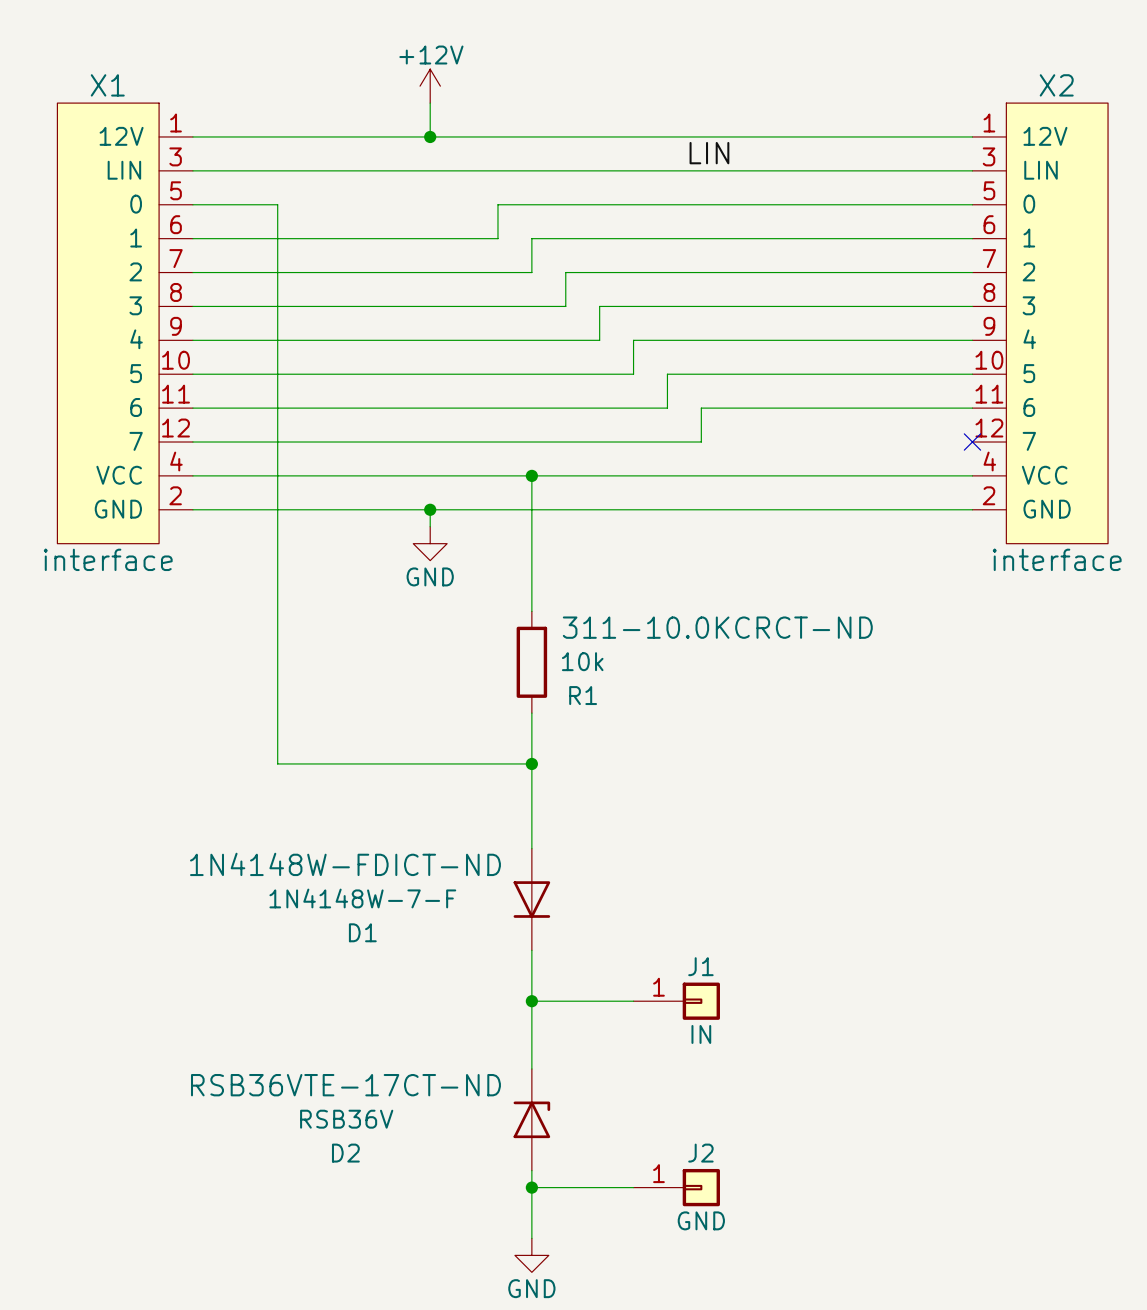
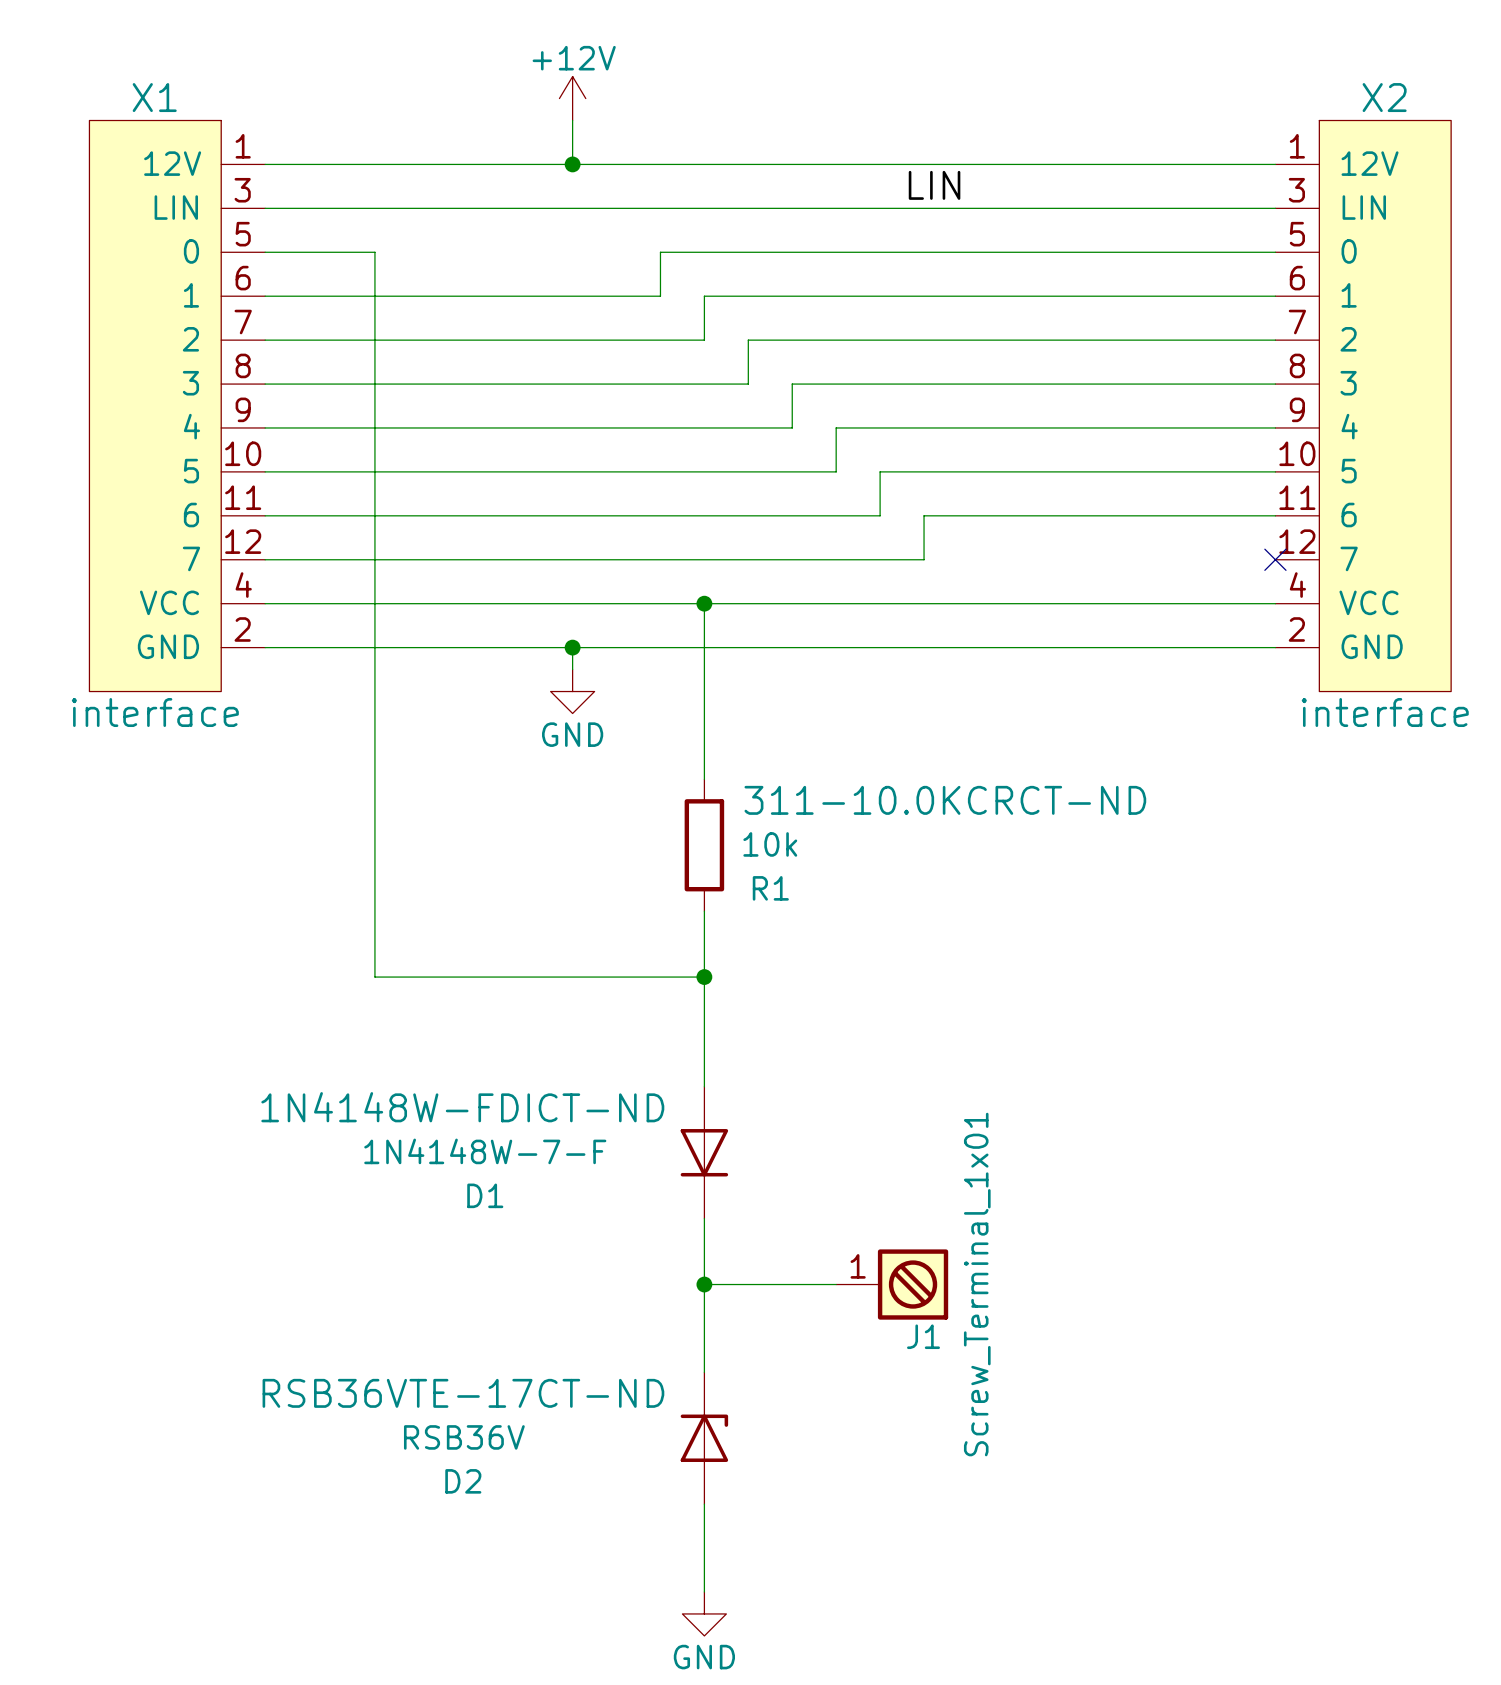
J1 name position: J1 (700, 966) -> J1 (923, 1336)
J1 symbol: [633, 982, 720, 1020] -> [836, 1249, 949, 1320]
J1 value: IN (701, 1034) -> Screw_Terminal_1x01 (977, 1284)
wire: (531, 1187) (633, 1187) -> none
junction: (531, 1187) -> none
J2: GND (676, 1187) -> none

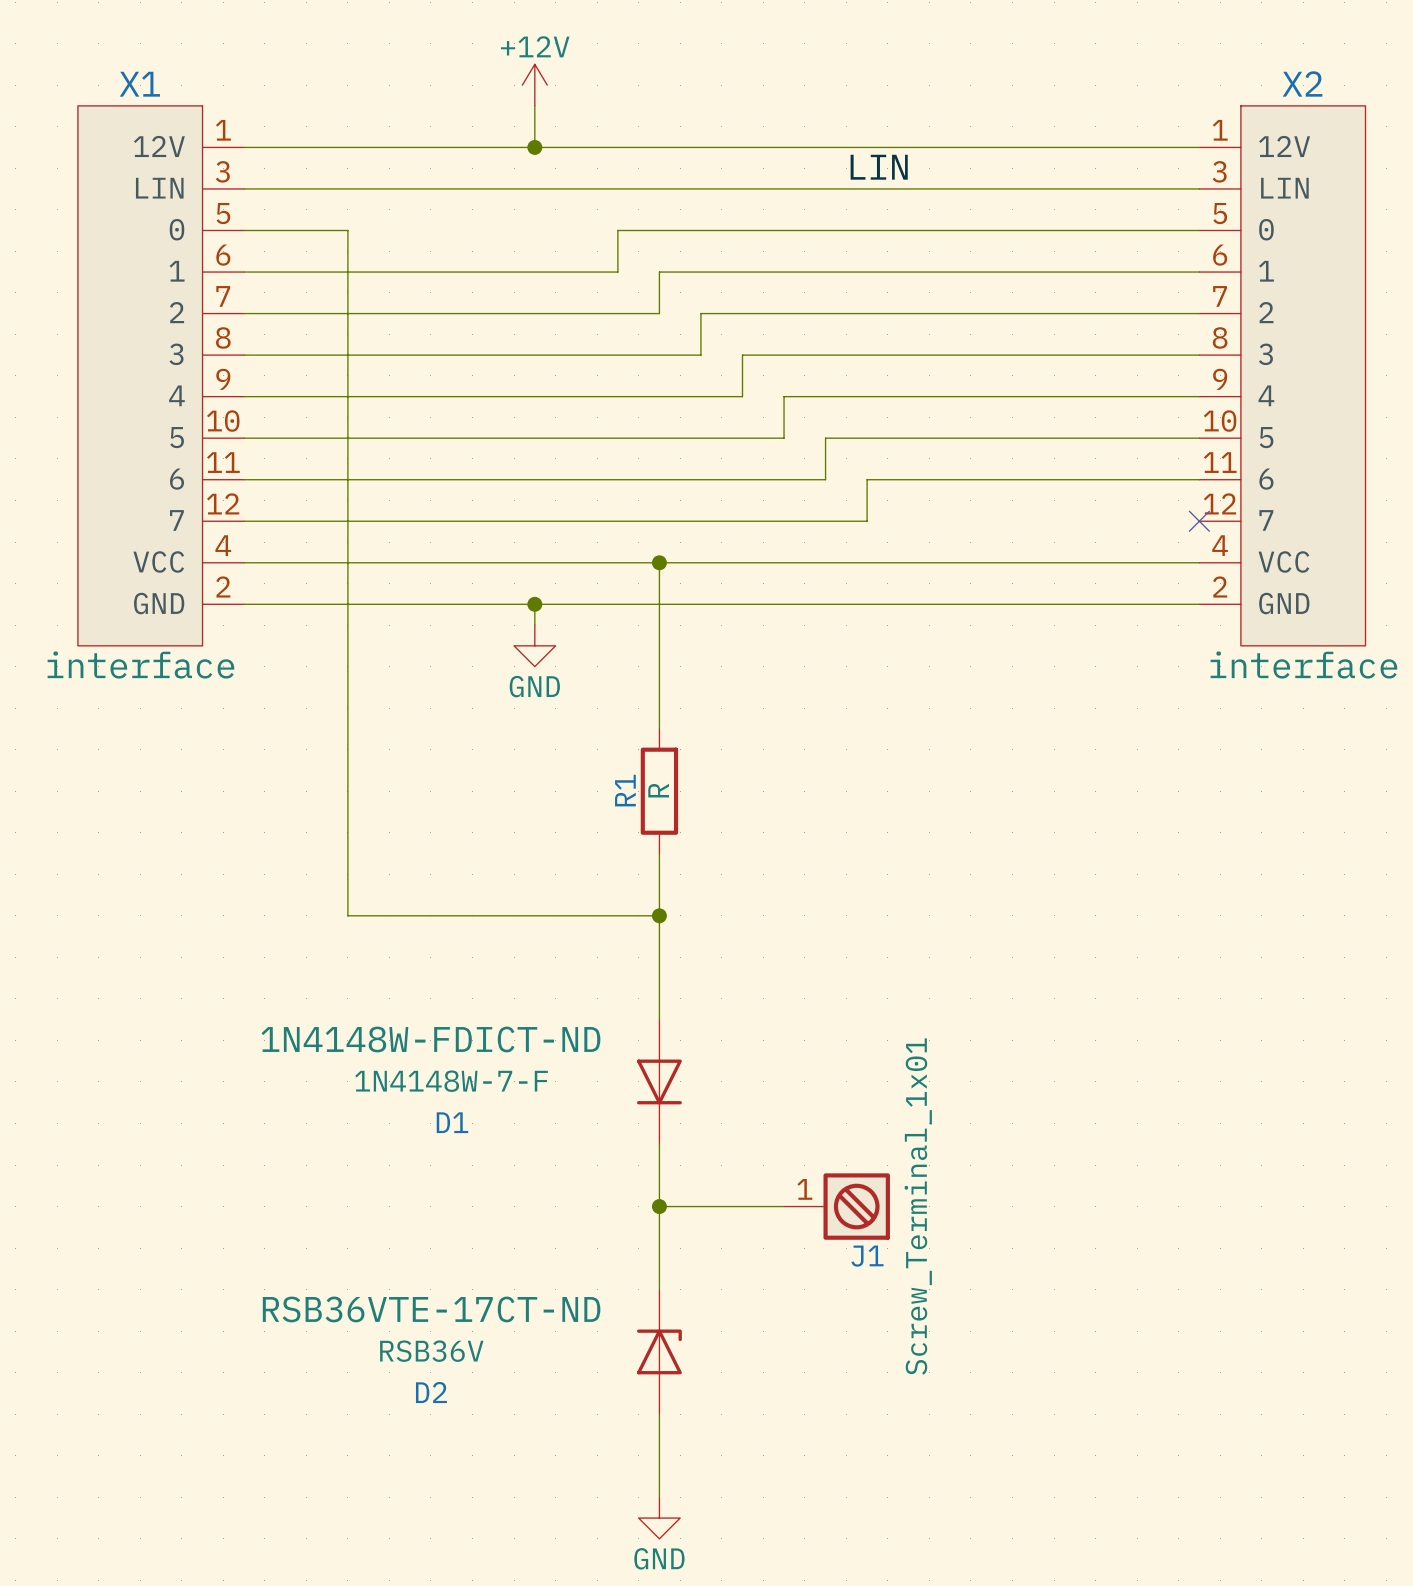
R1 text: 311-10.0KCRCT-ND (945, 800) -> none
R1 value: 10k (770, 844) -> R (658, 790)
R1 name rotation: 0° (770, 888) -> 90° counterclockwise (625, 790)
R1 name position: R1 (770, 888) -> R1 (625, 790)

